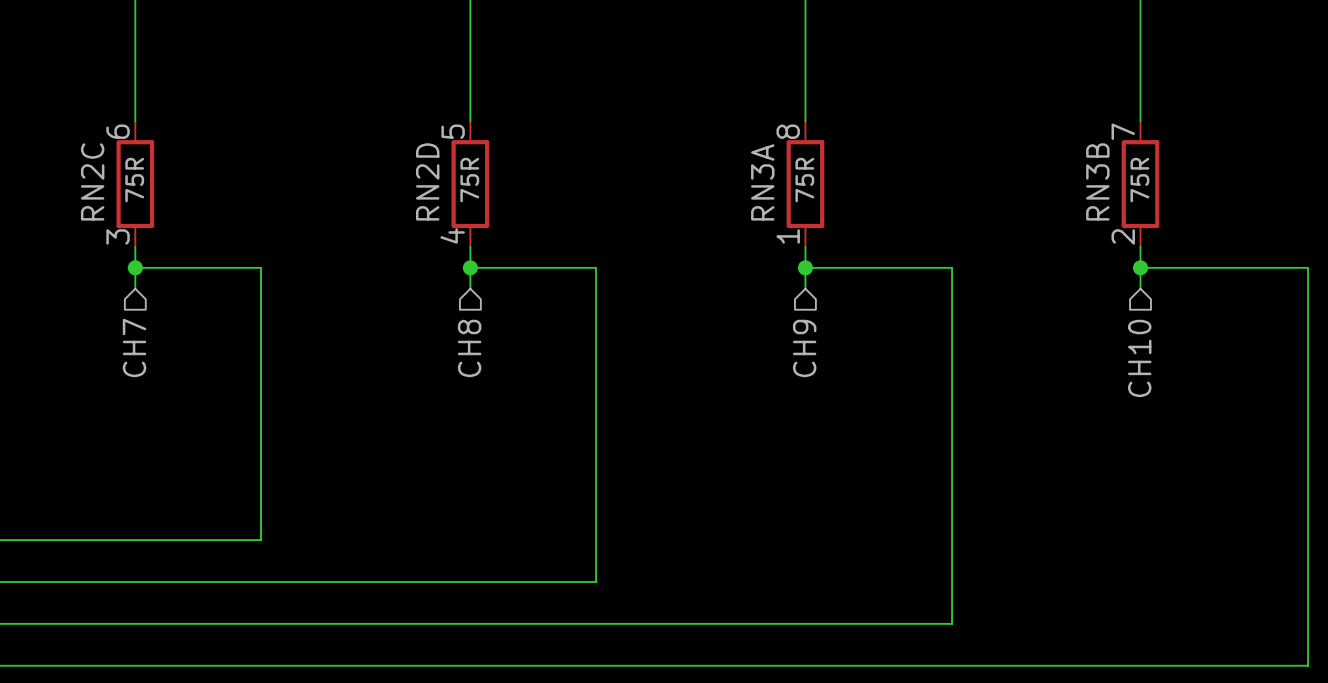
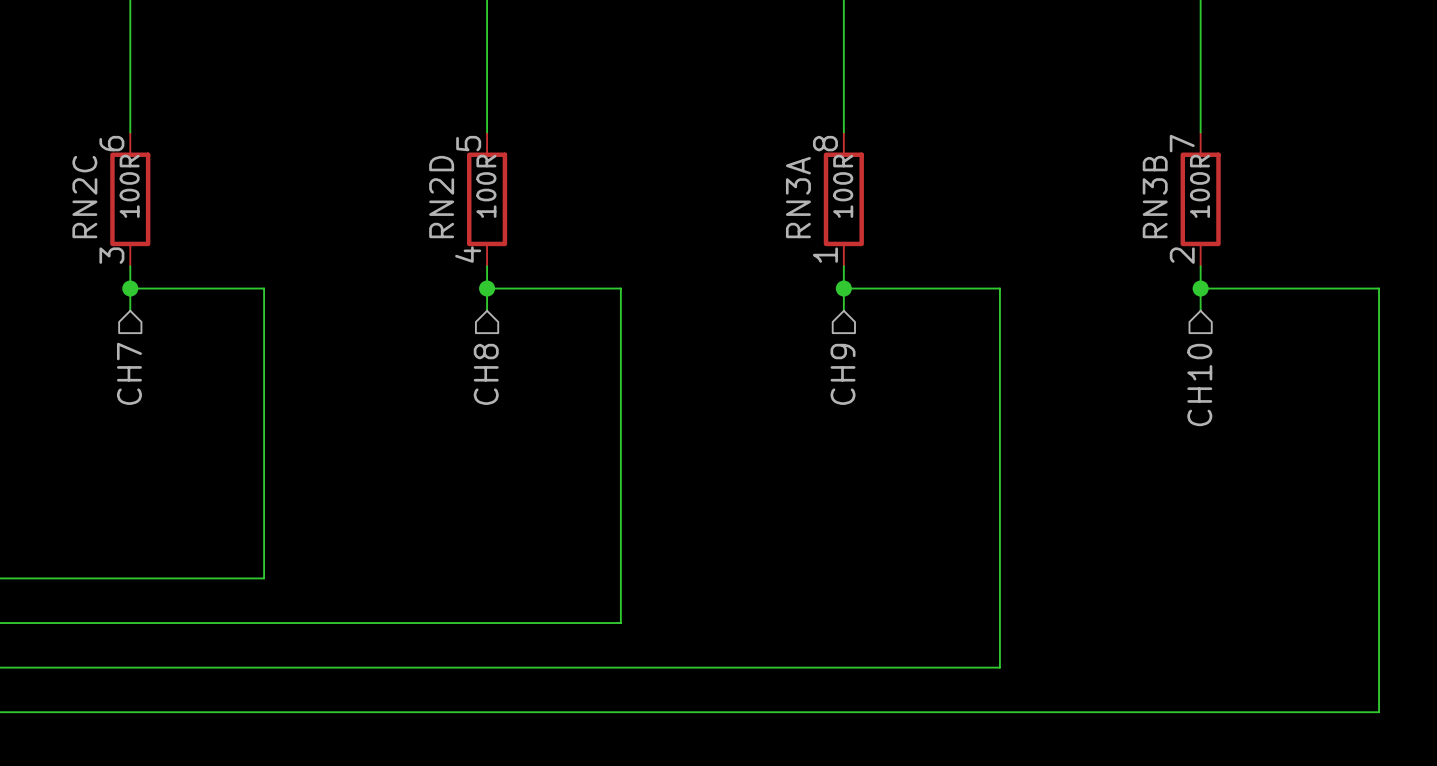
RN2C value: 75R (134, 180) -> 100R (129, 186)
RN2D value: 75R (469, 180) -> 100R (486, 186)
RN3A value: 75R (804, 180) -> 100R (843, 186)
RN3B value: 75R (1139, 180) -> 100R (1199, 186)

